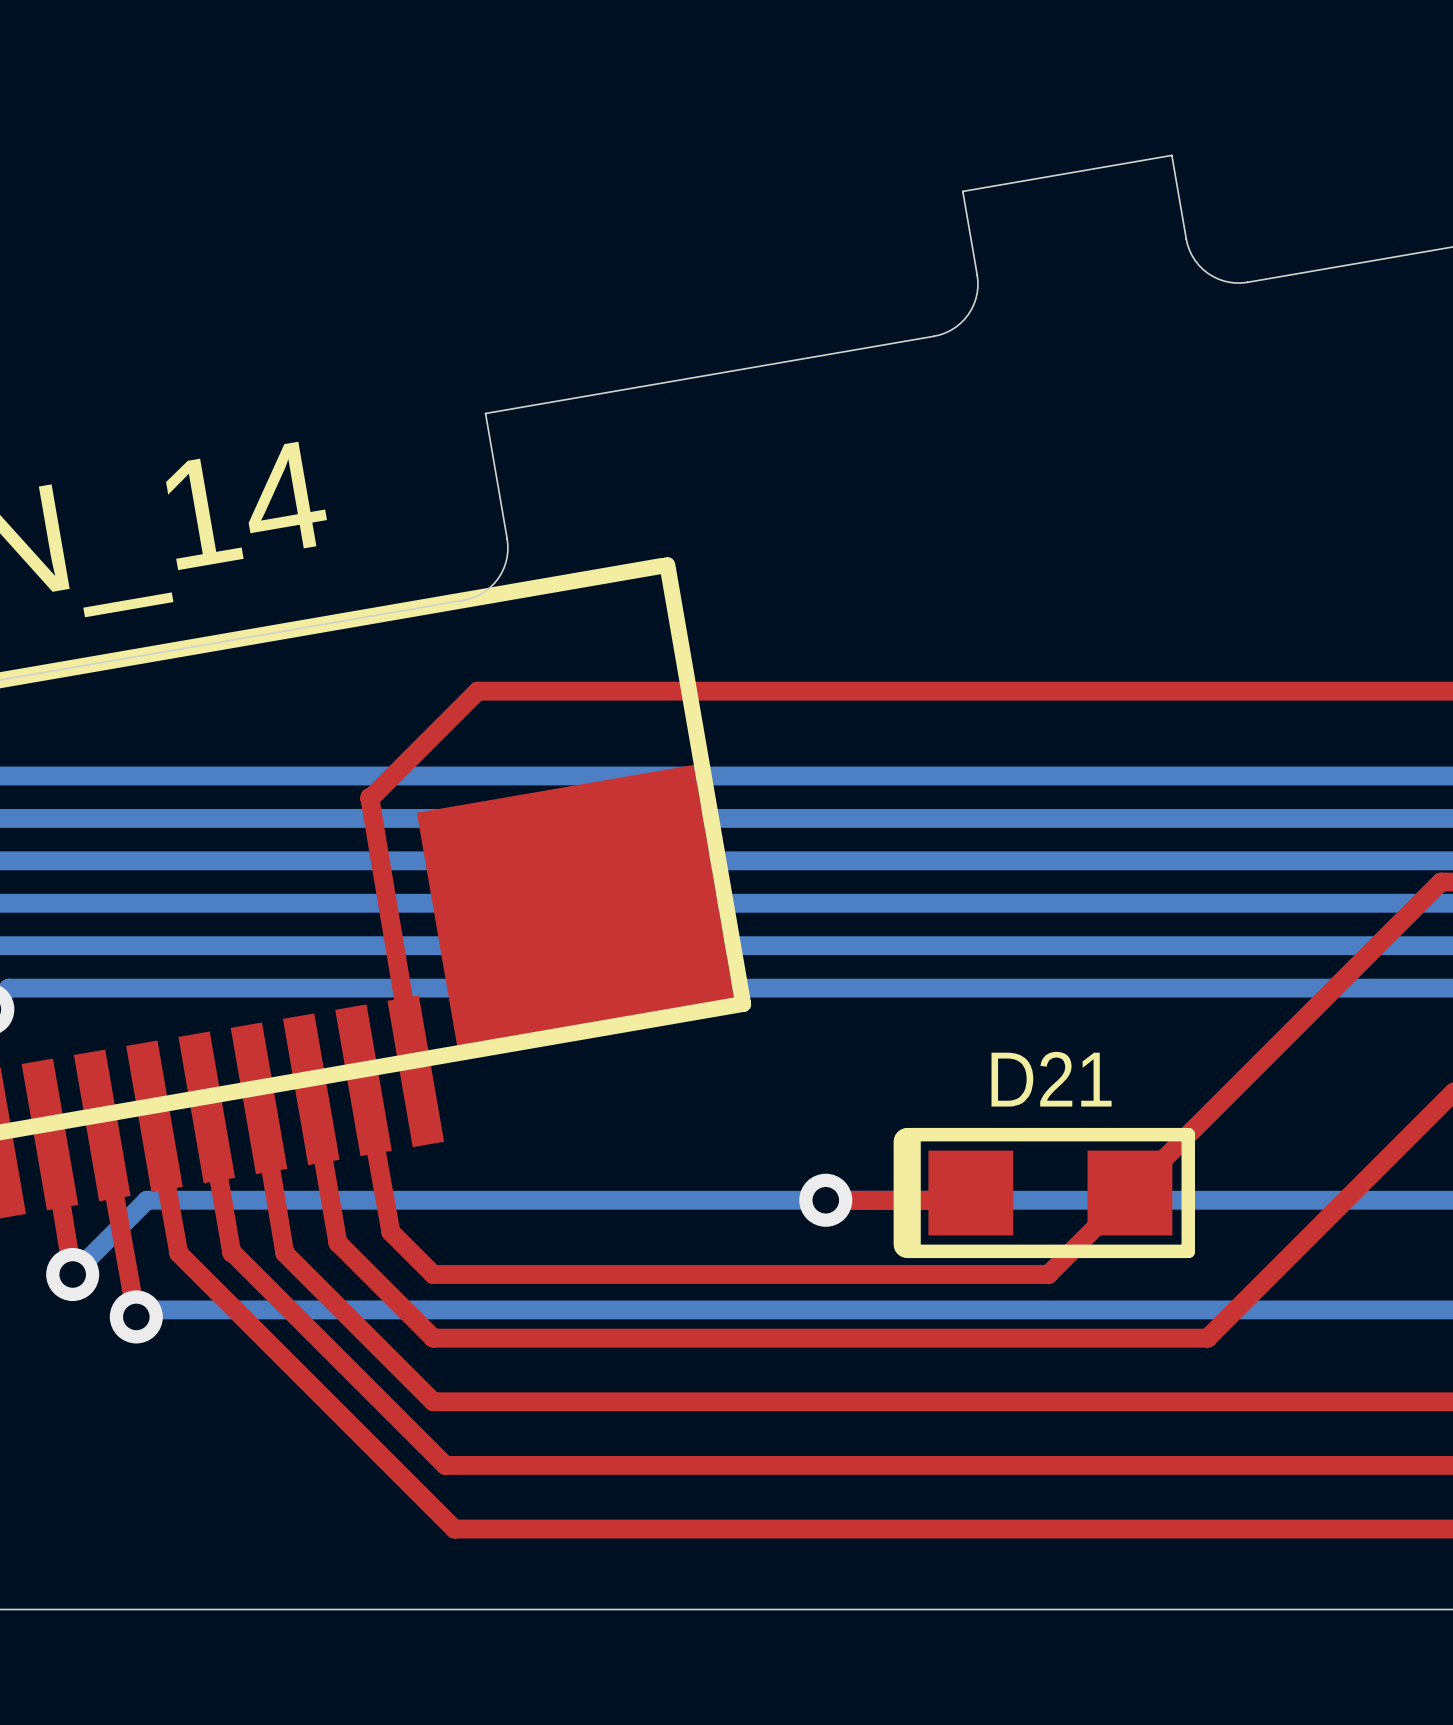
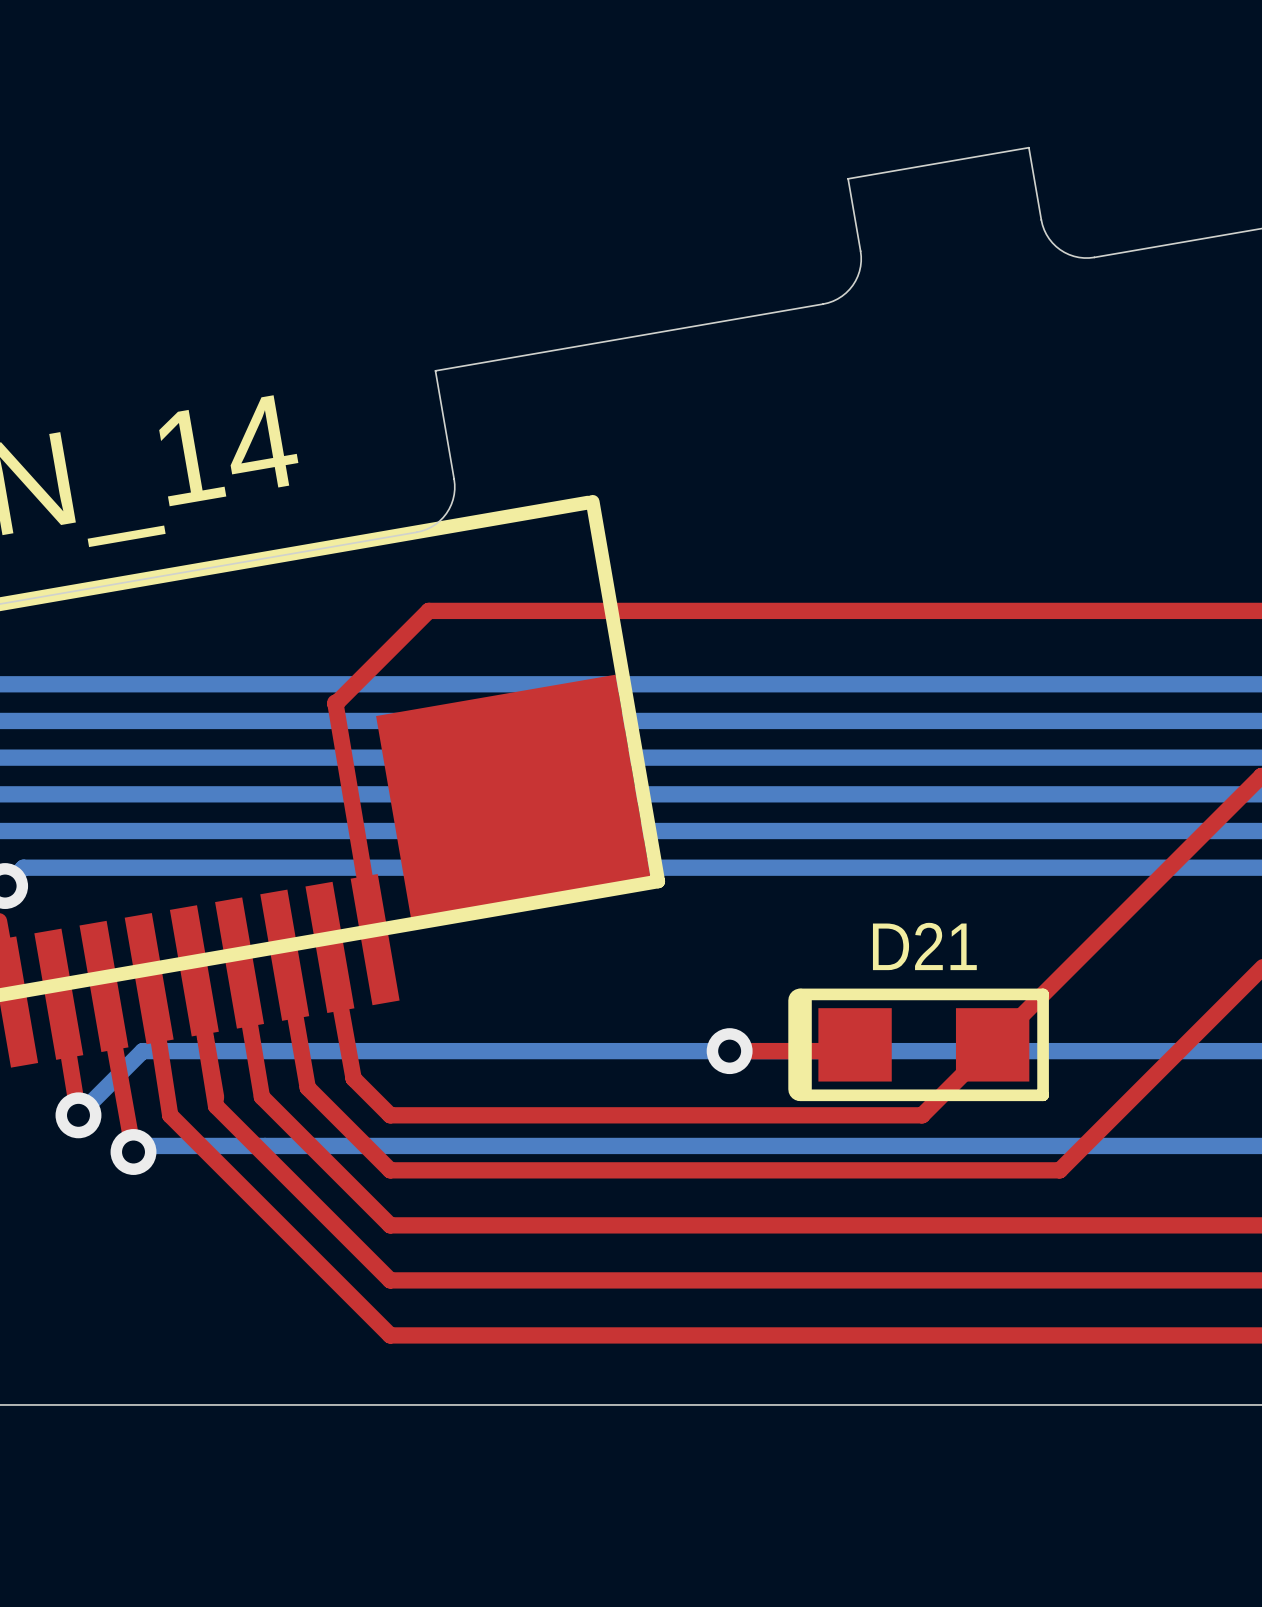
top track: (154, 1116) (178, 1253) (454, 1529) -> (149, 978) (170, 1115) (390, 1335) (408, 1335)
top track: (231, 1251) (445, 1465) -> (194, 970) (216, 1106) (390, 1280) (400, 1280)

